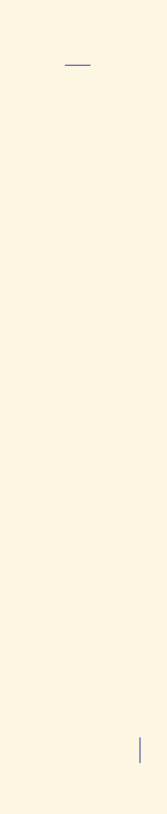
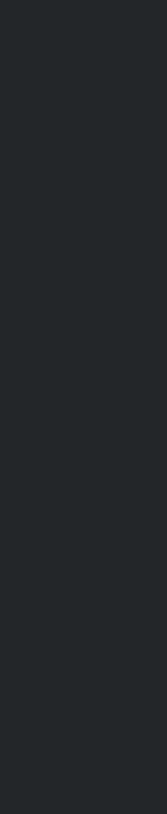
line: (65, 65) (90, 65) -> none
line: (139, 737) (139, 762) -> none

